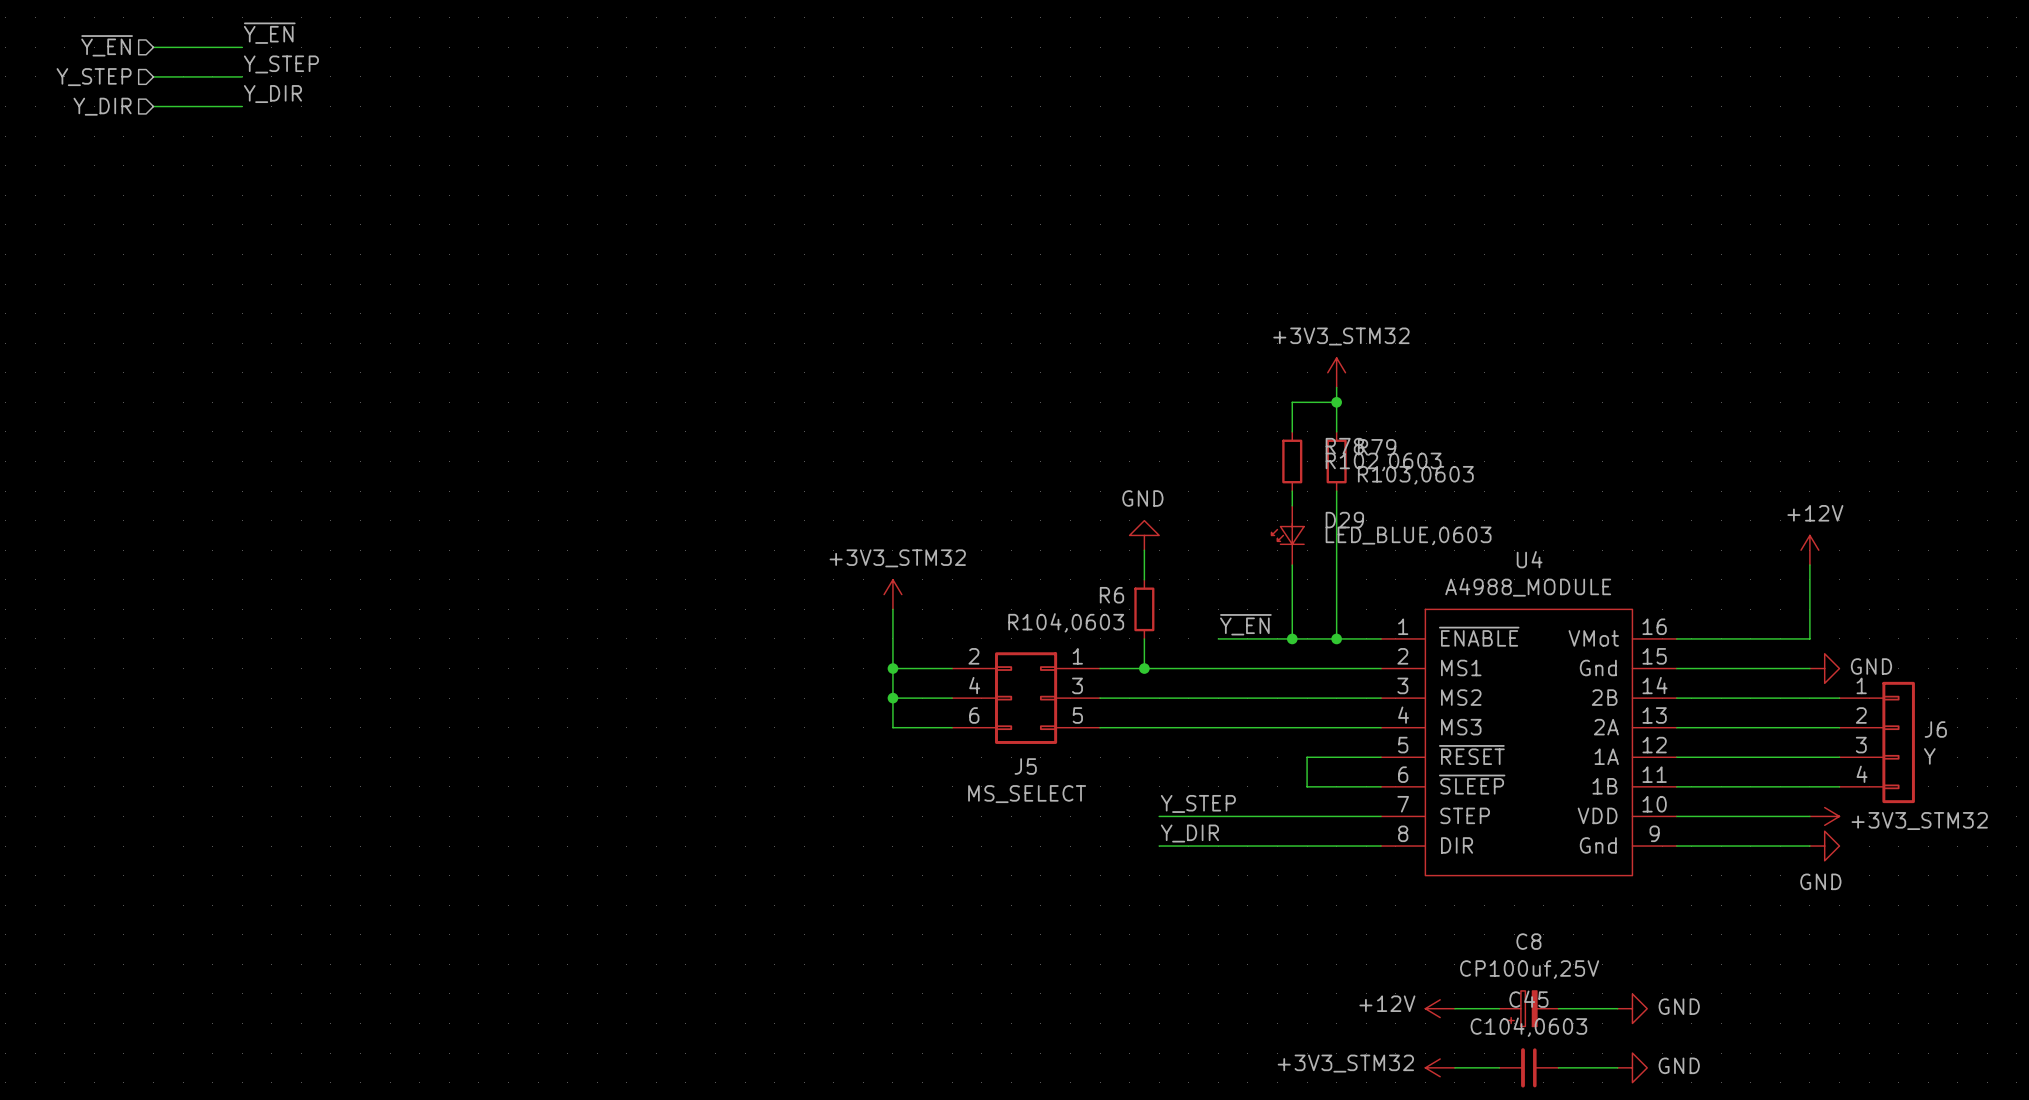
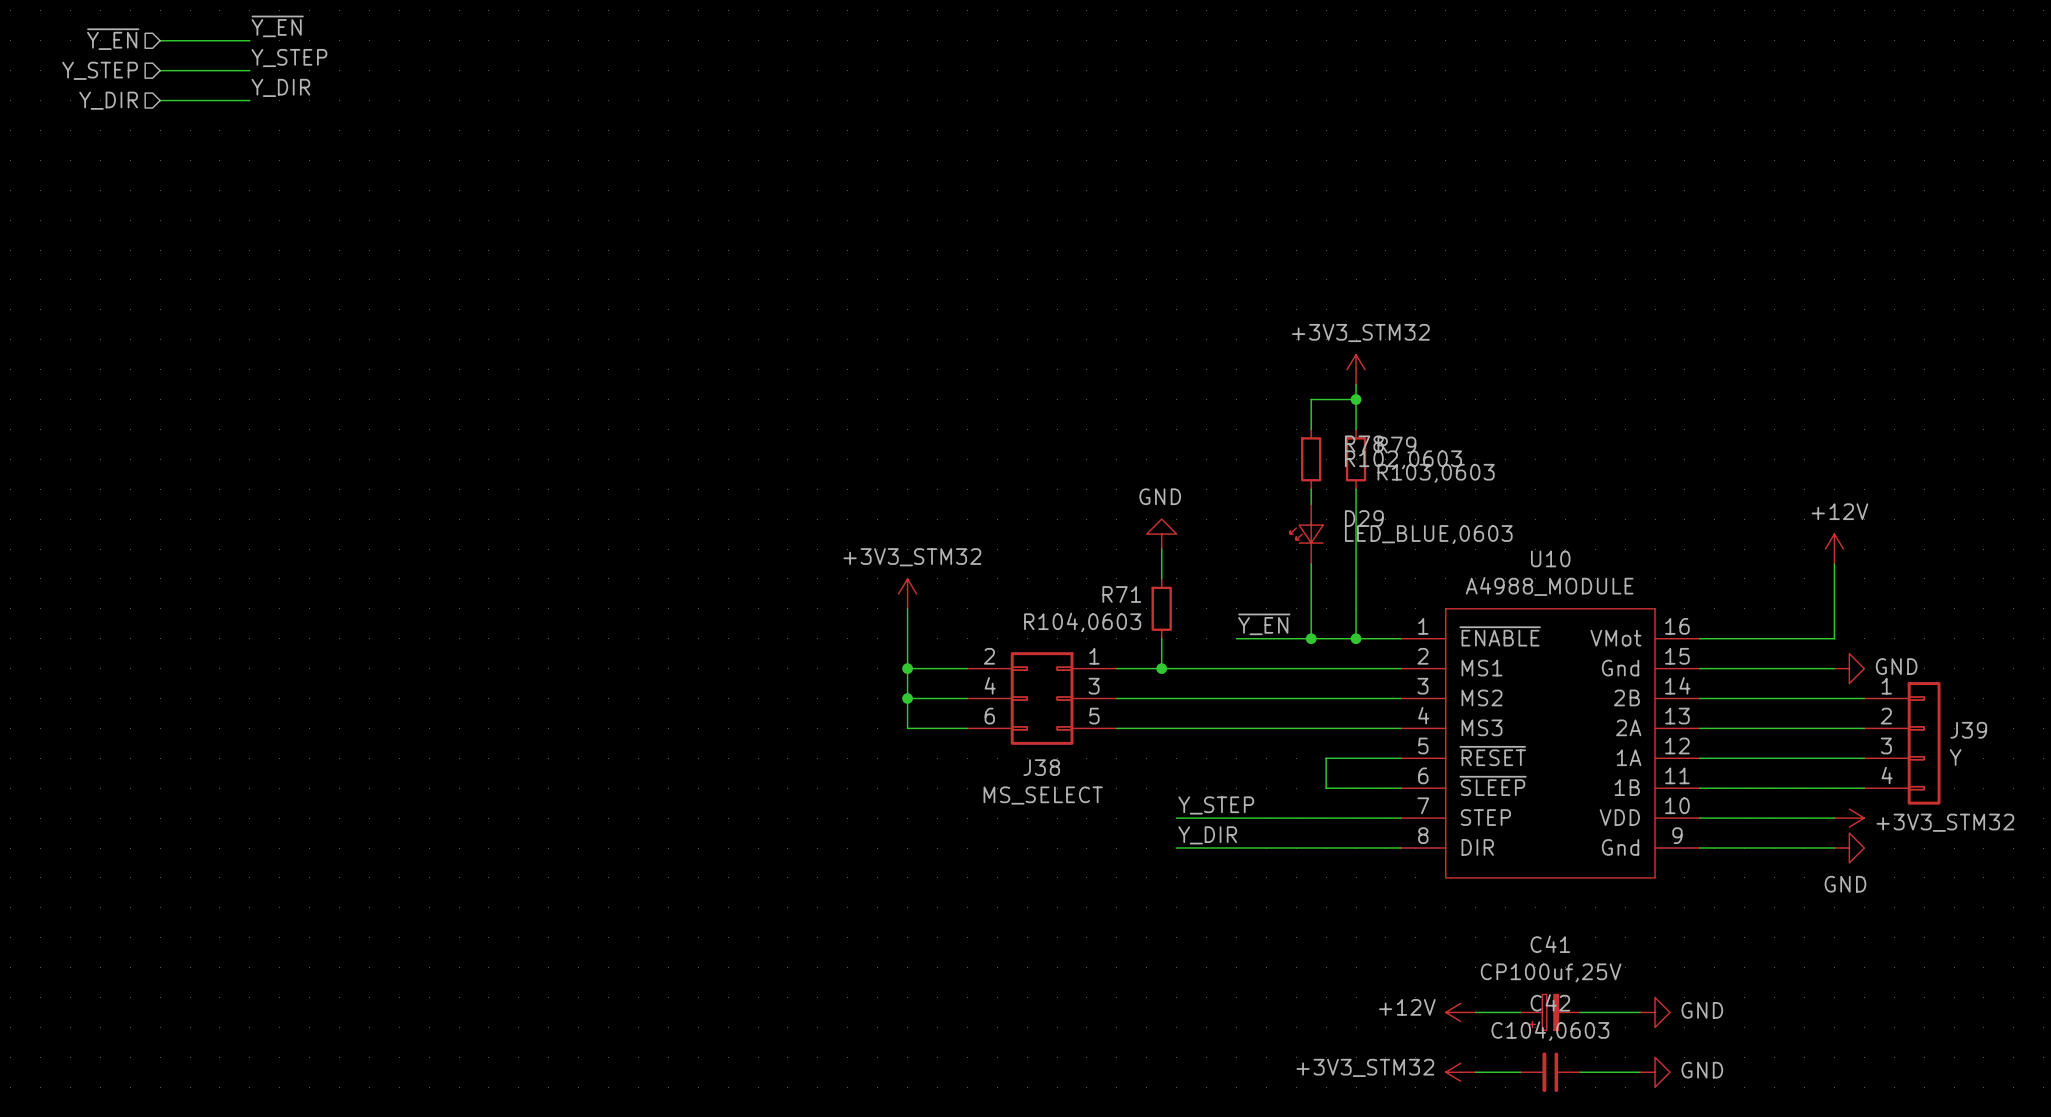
U4 name: U4 (1529, 559) -> U10 (1550, 558)
R6 name: R6 (1111, 595) -> R71 (1121, 594)
J6 name: J6 (1935, 729) -> J39 (1968, 730)
J5 name: J5 (1025, 766) -> J38 (1041, 767)
C8 name: C8 (1528, 941) -> C41 (1550, 944)
C45 name: C45 (1528, 999) -> C42 (1550, 1002)

